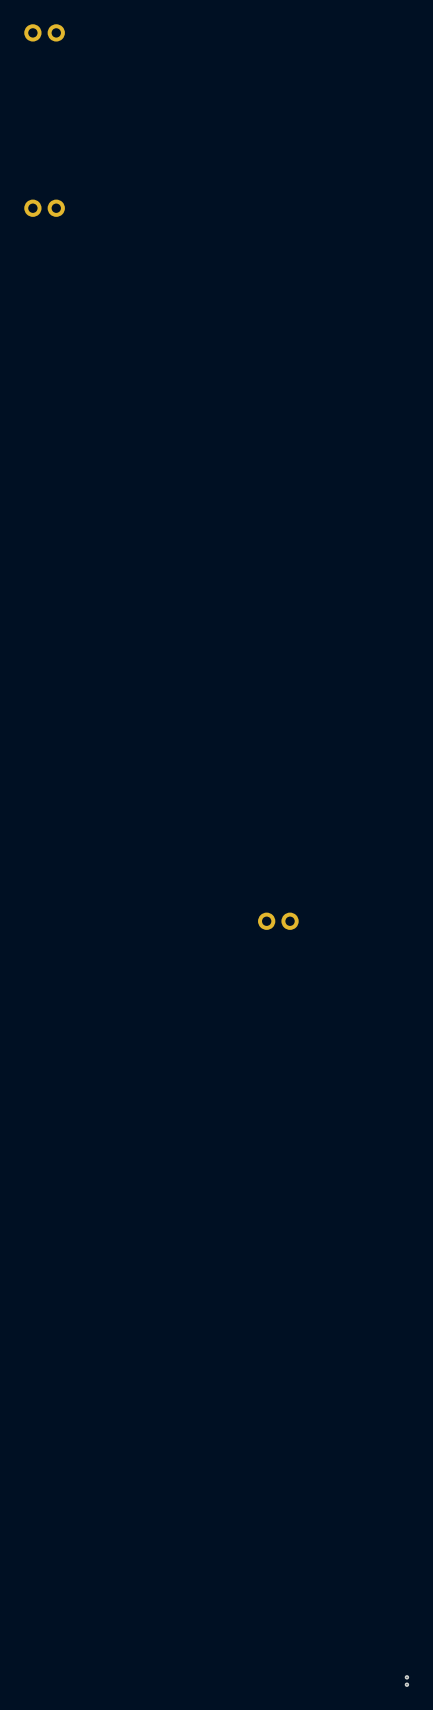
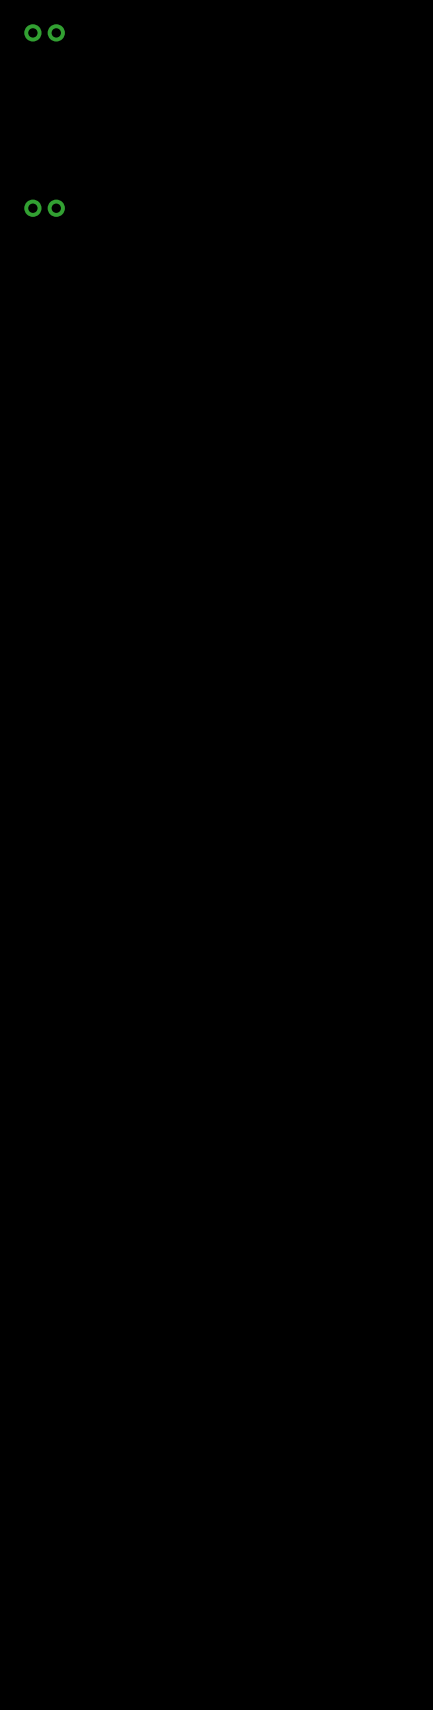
part: (278, 921) -> none
part: (406, 1681) -> none

